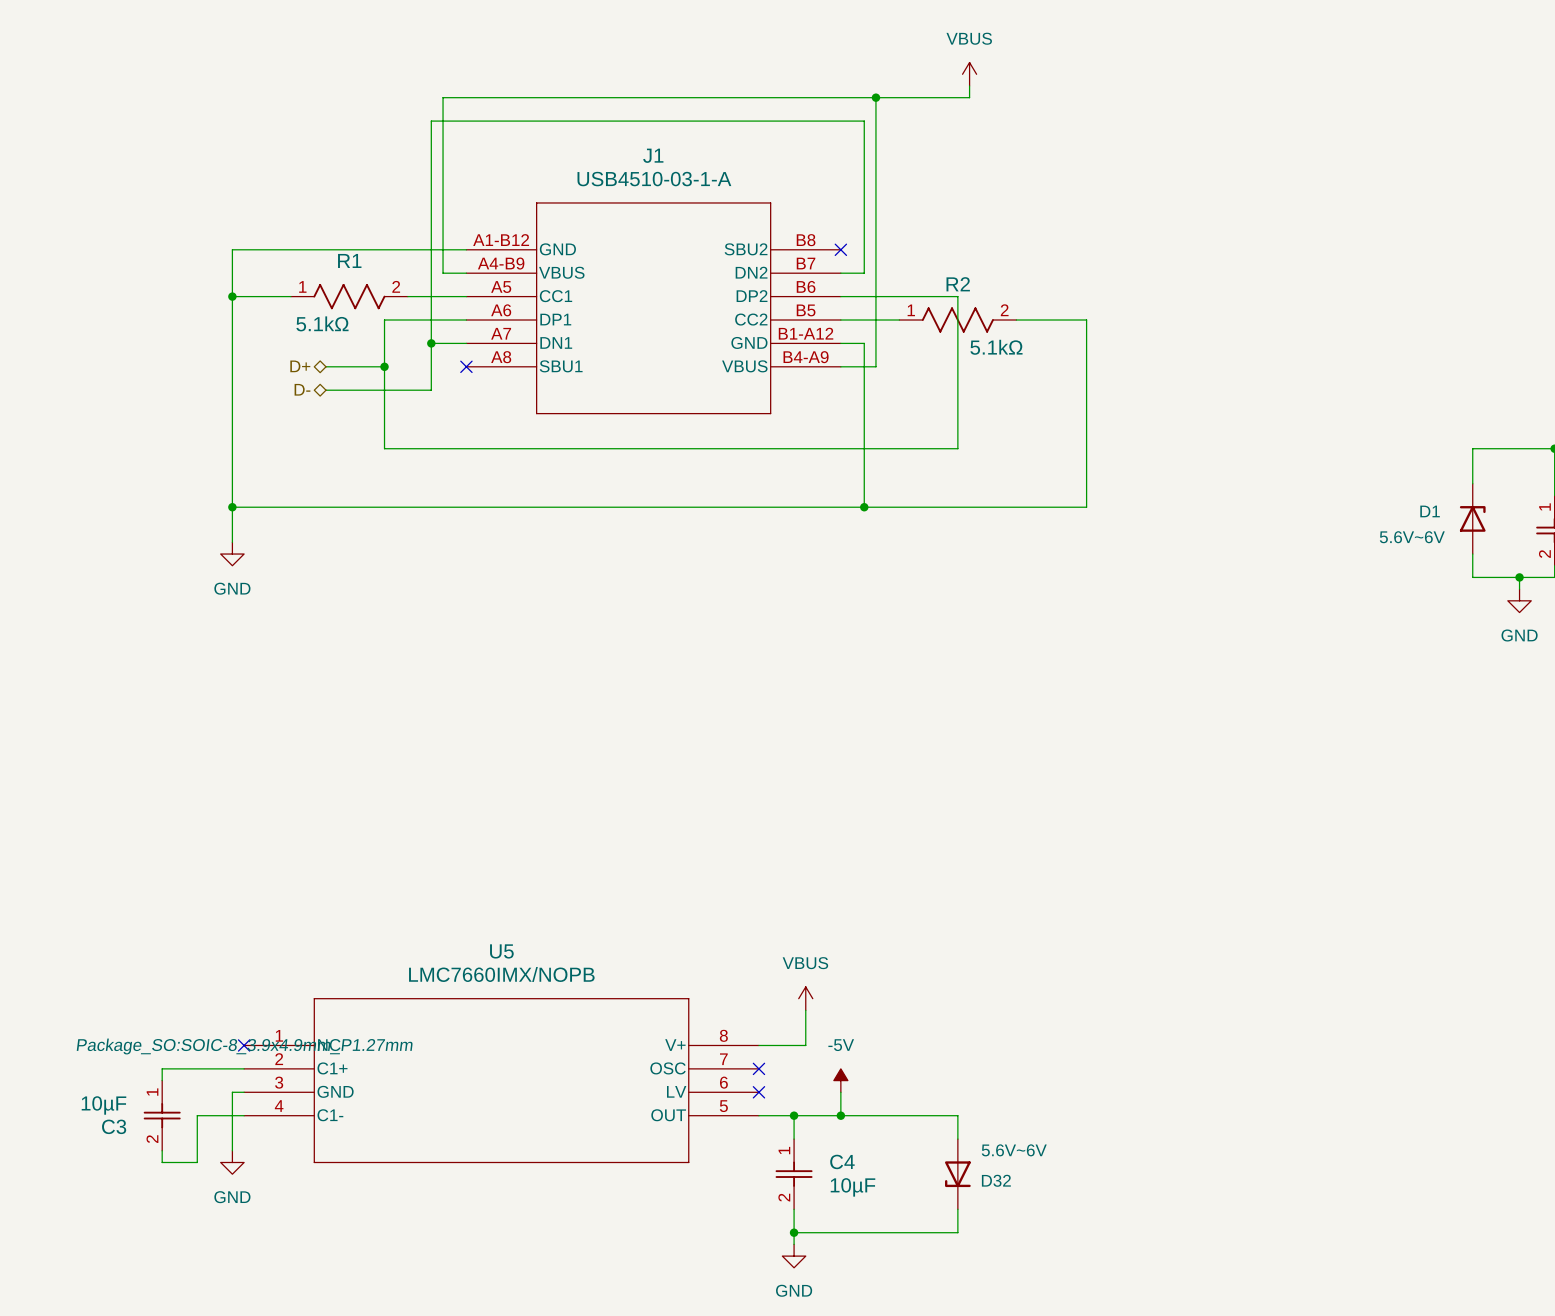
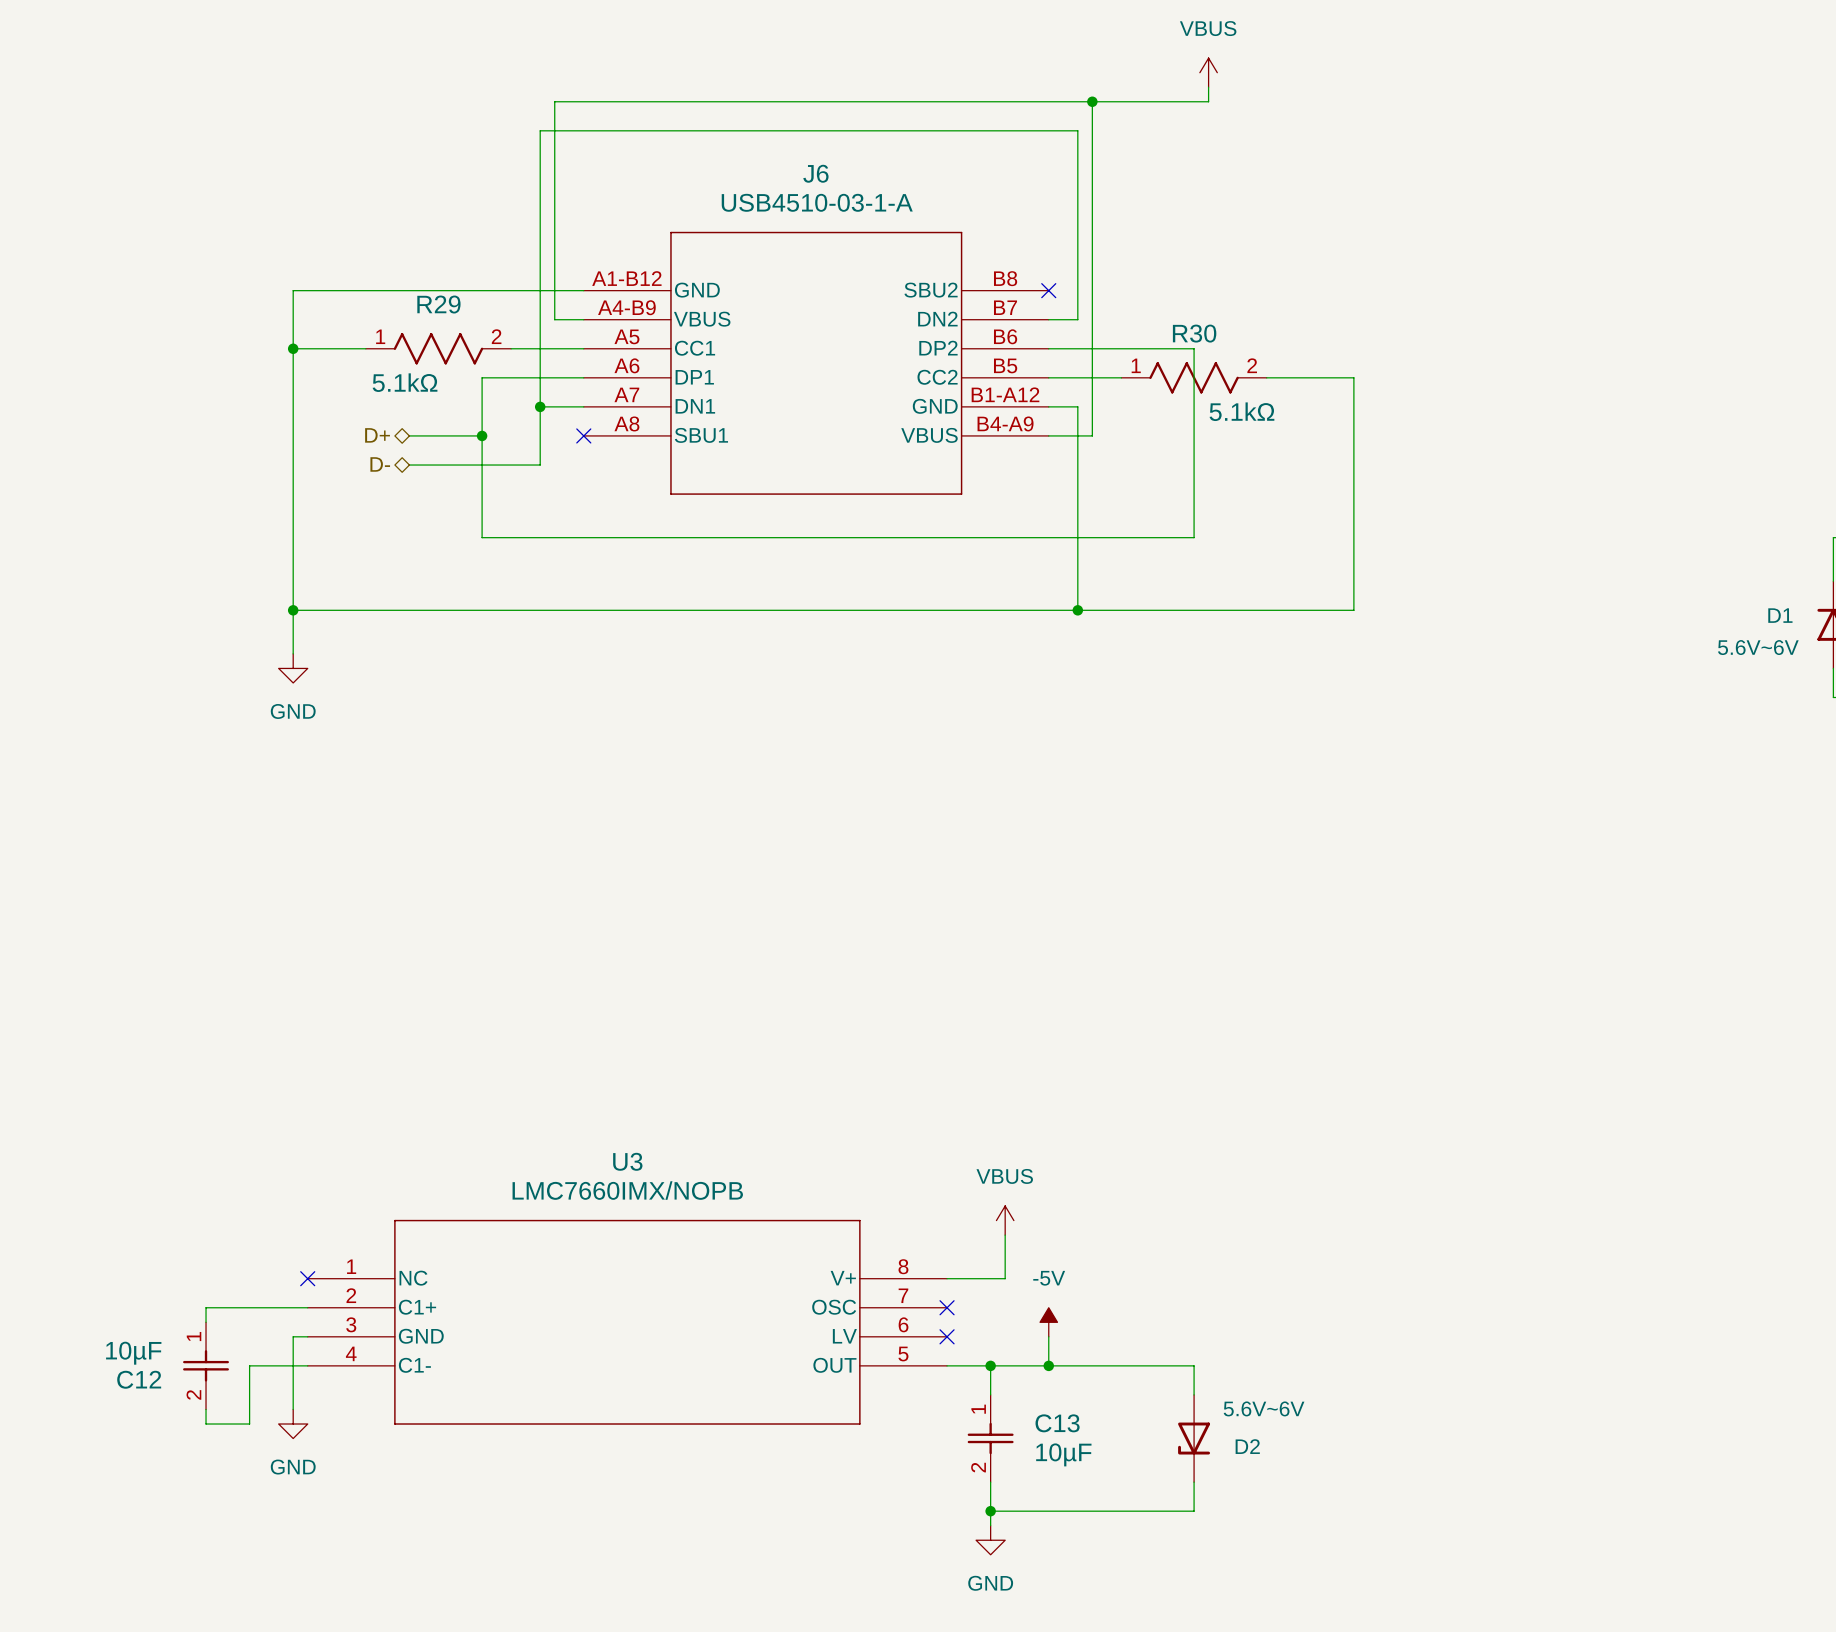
J1 name: J1 (653, 155) -> J6 (815, 173)
R1 name: R1 (349, 260) -> R29 (438, 304)
R2 name: R2 (958, 284) -> R30 (1194, 333)
U5 name: U5 (501, 951) -> U3 (627, 1161)
U5 text: Package_SO:SOIC-8_3.9x4.9mm_P1.27mm (244, 1046) -> none
C3 name: C3 (114, 1126) -> C12 (139, 1379)
C4 name: C4 (842, 1161) -> C13 (1057, 1423)
D32 name: D32 (996, 1180) -> D2 (1247, 1446)

